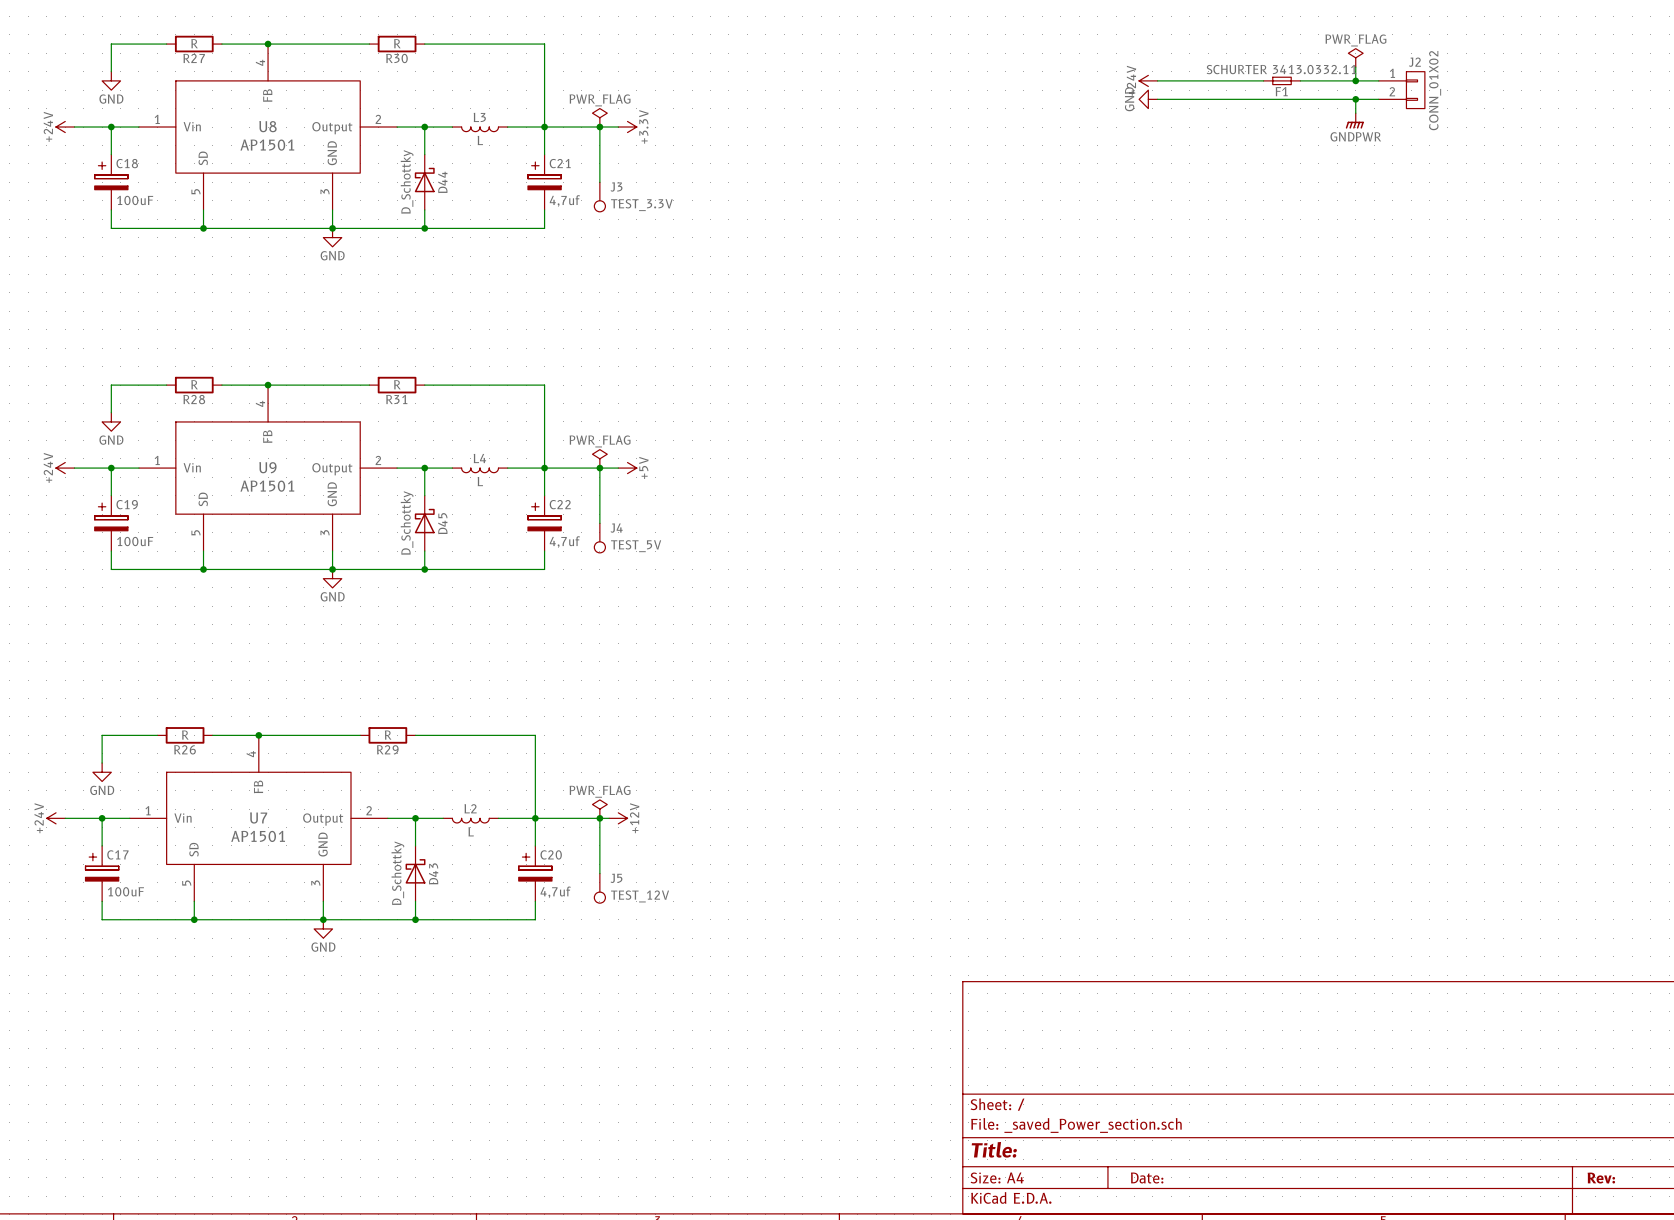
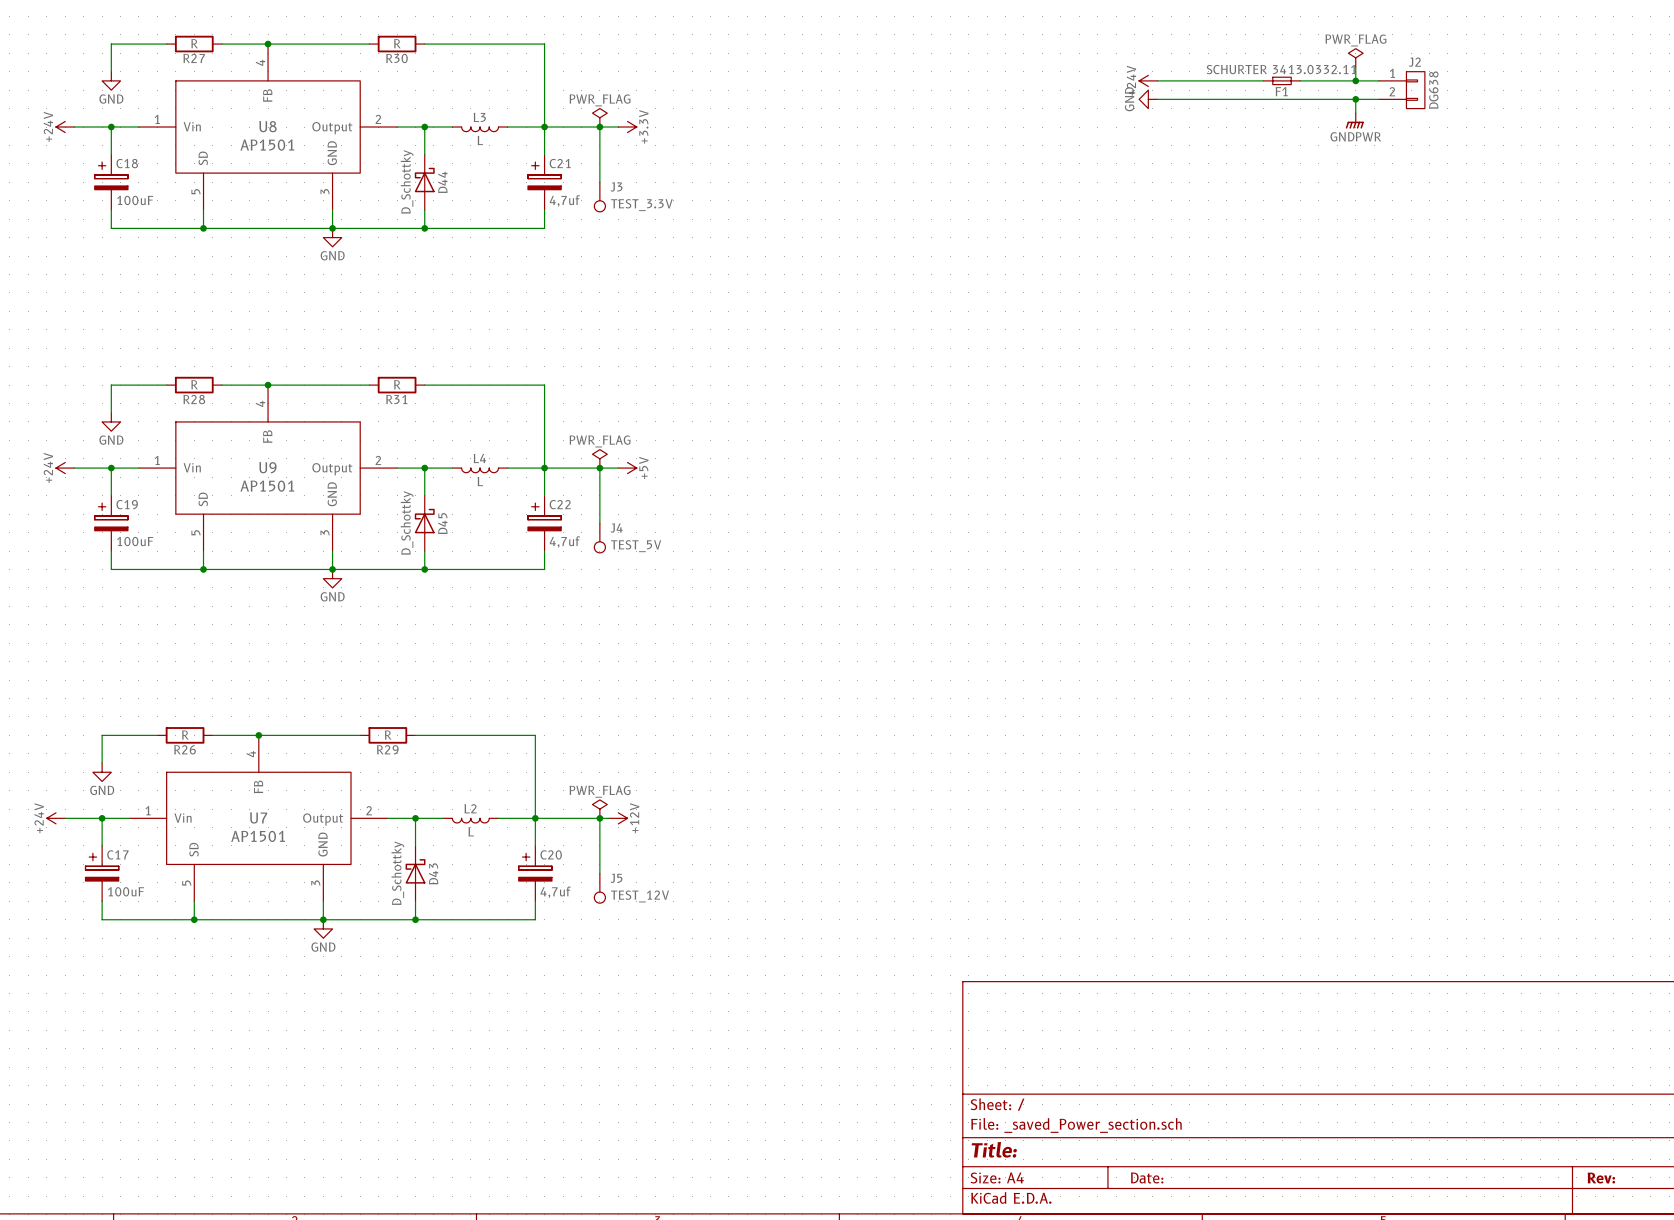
J2 value: CONN_01X02 (1435, 90) -> DG638 (1433, 90)

